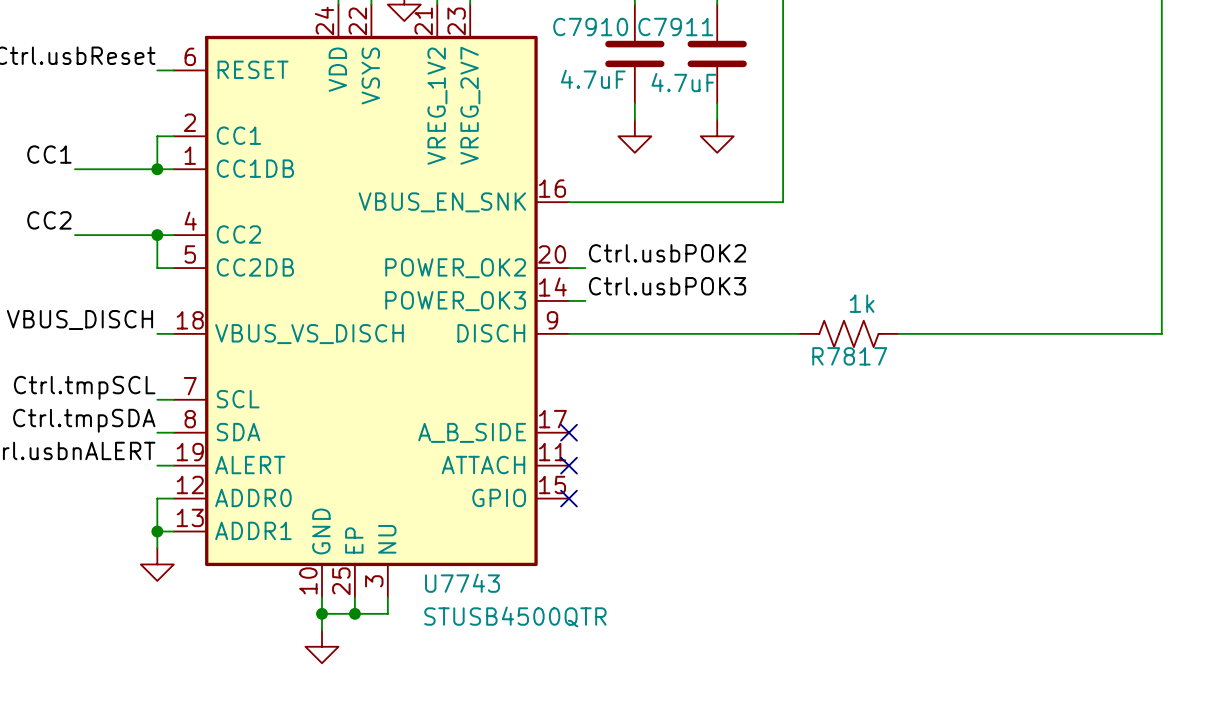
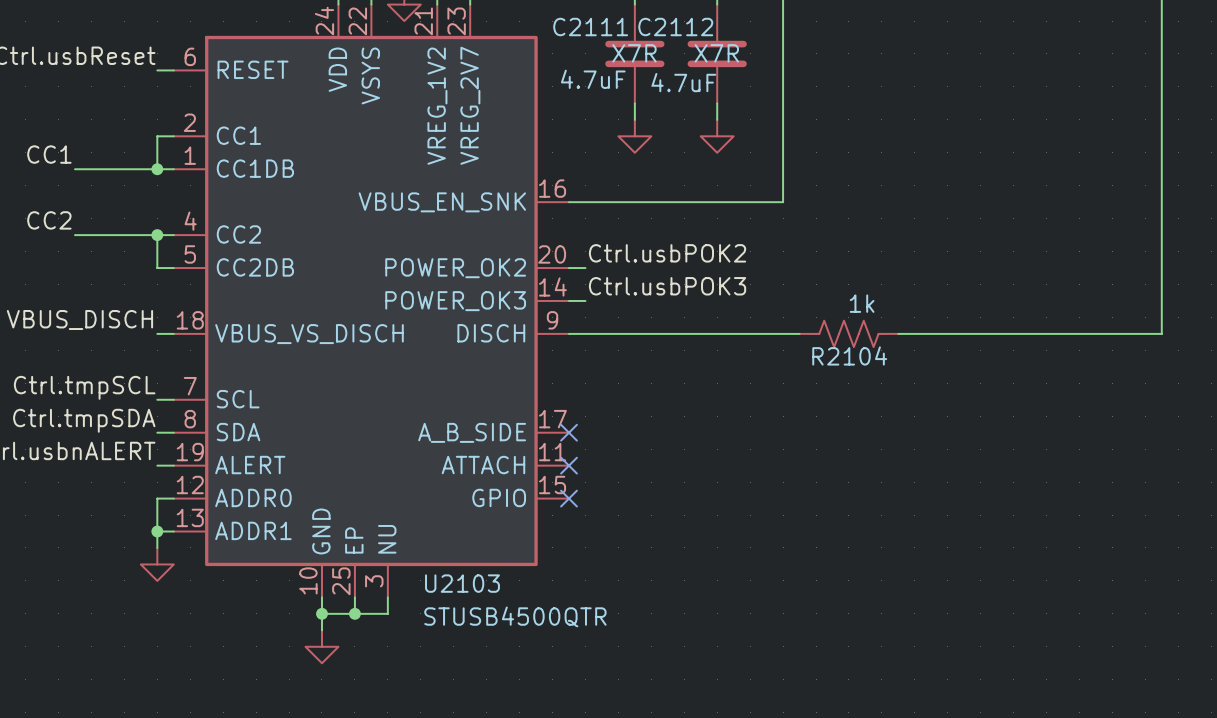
C7910 name: C7910 (590, 27) -> C2111 (590, 27)
C7911 name: C7911 (675, 27) -> C2112 (675, 27)
C7910 text: none -> X7R (634, 53)
C7911 text: none -> X7R (716, 53)
R7817 name: R7817 (849, 356) -> R2104 (849, 355)
U7743 name: U7743 (462, 583) -> U2103 (462, 583)

